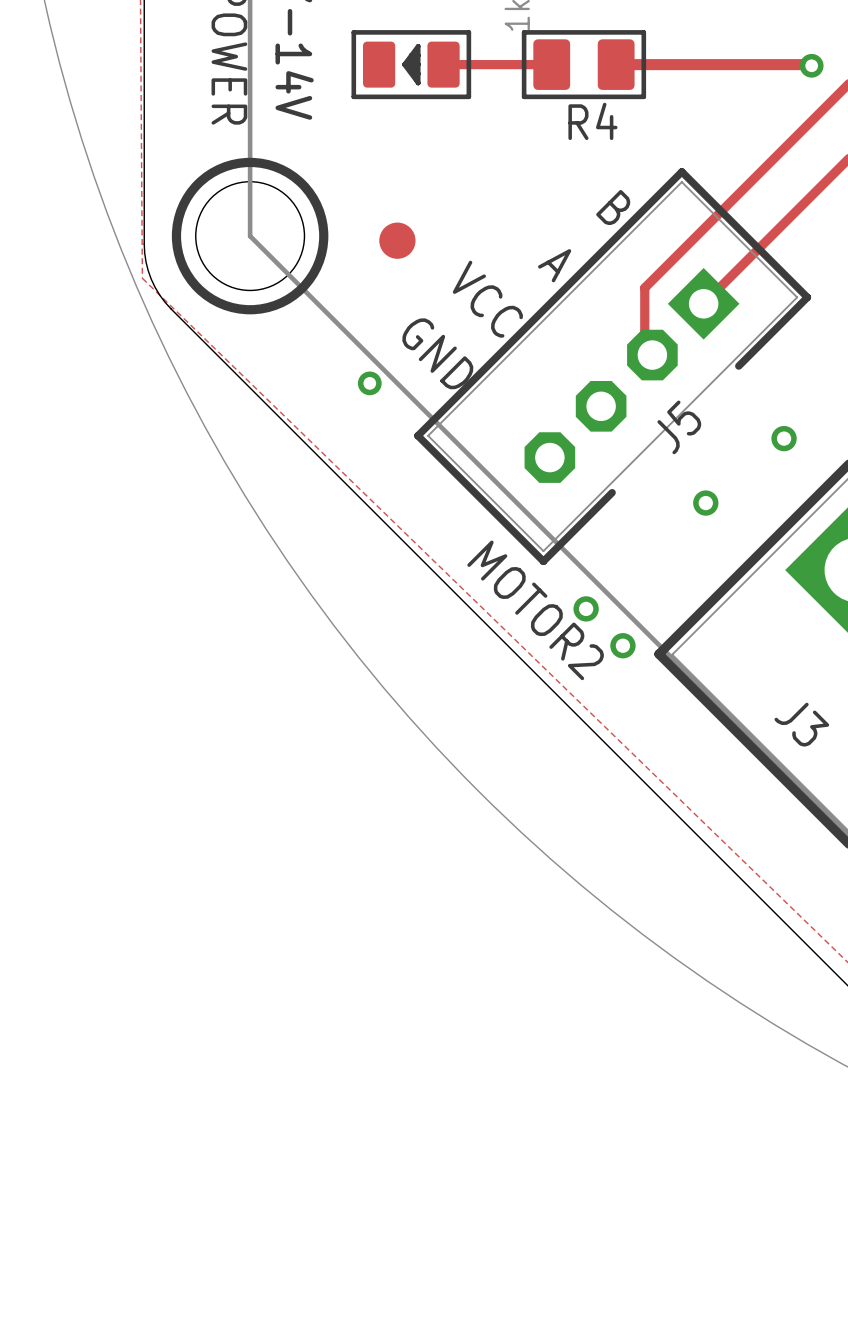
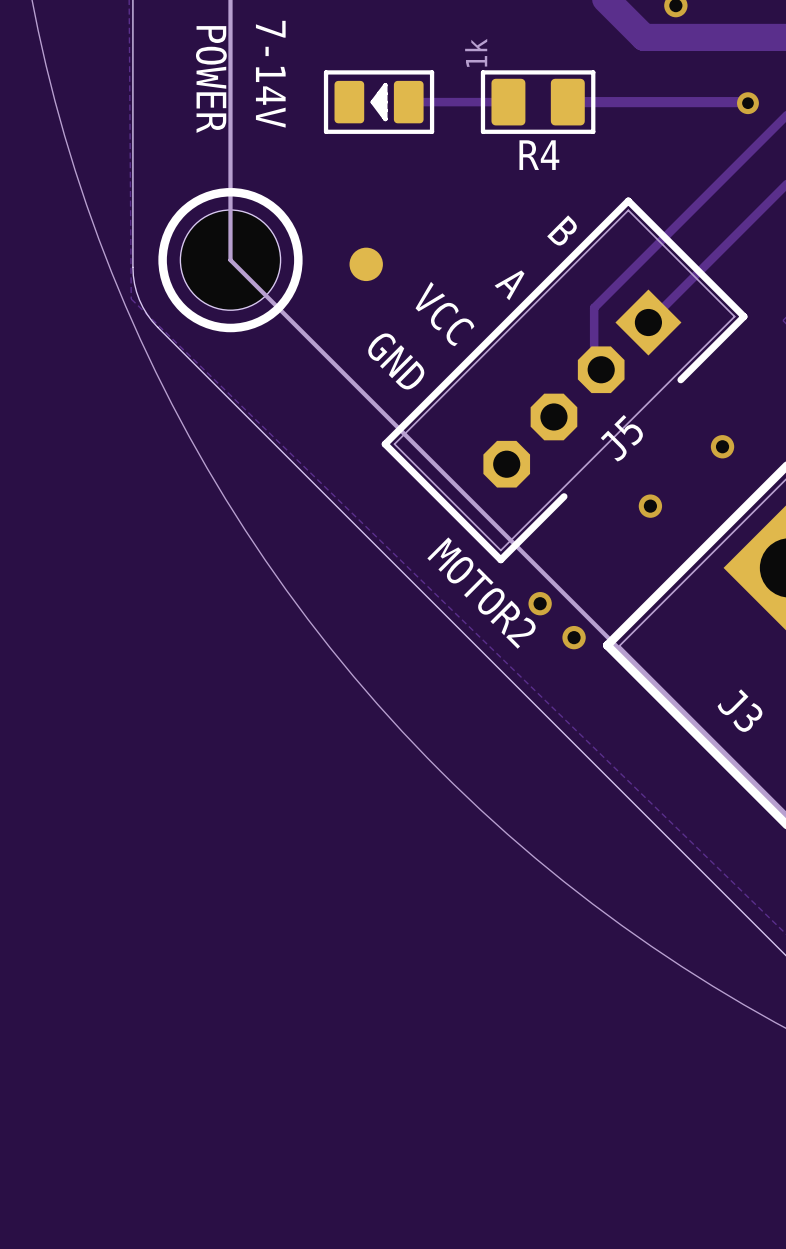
via: (369, 383) -> none

